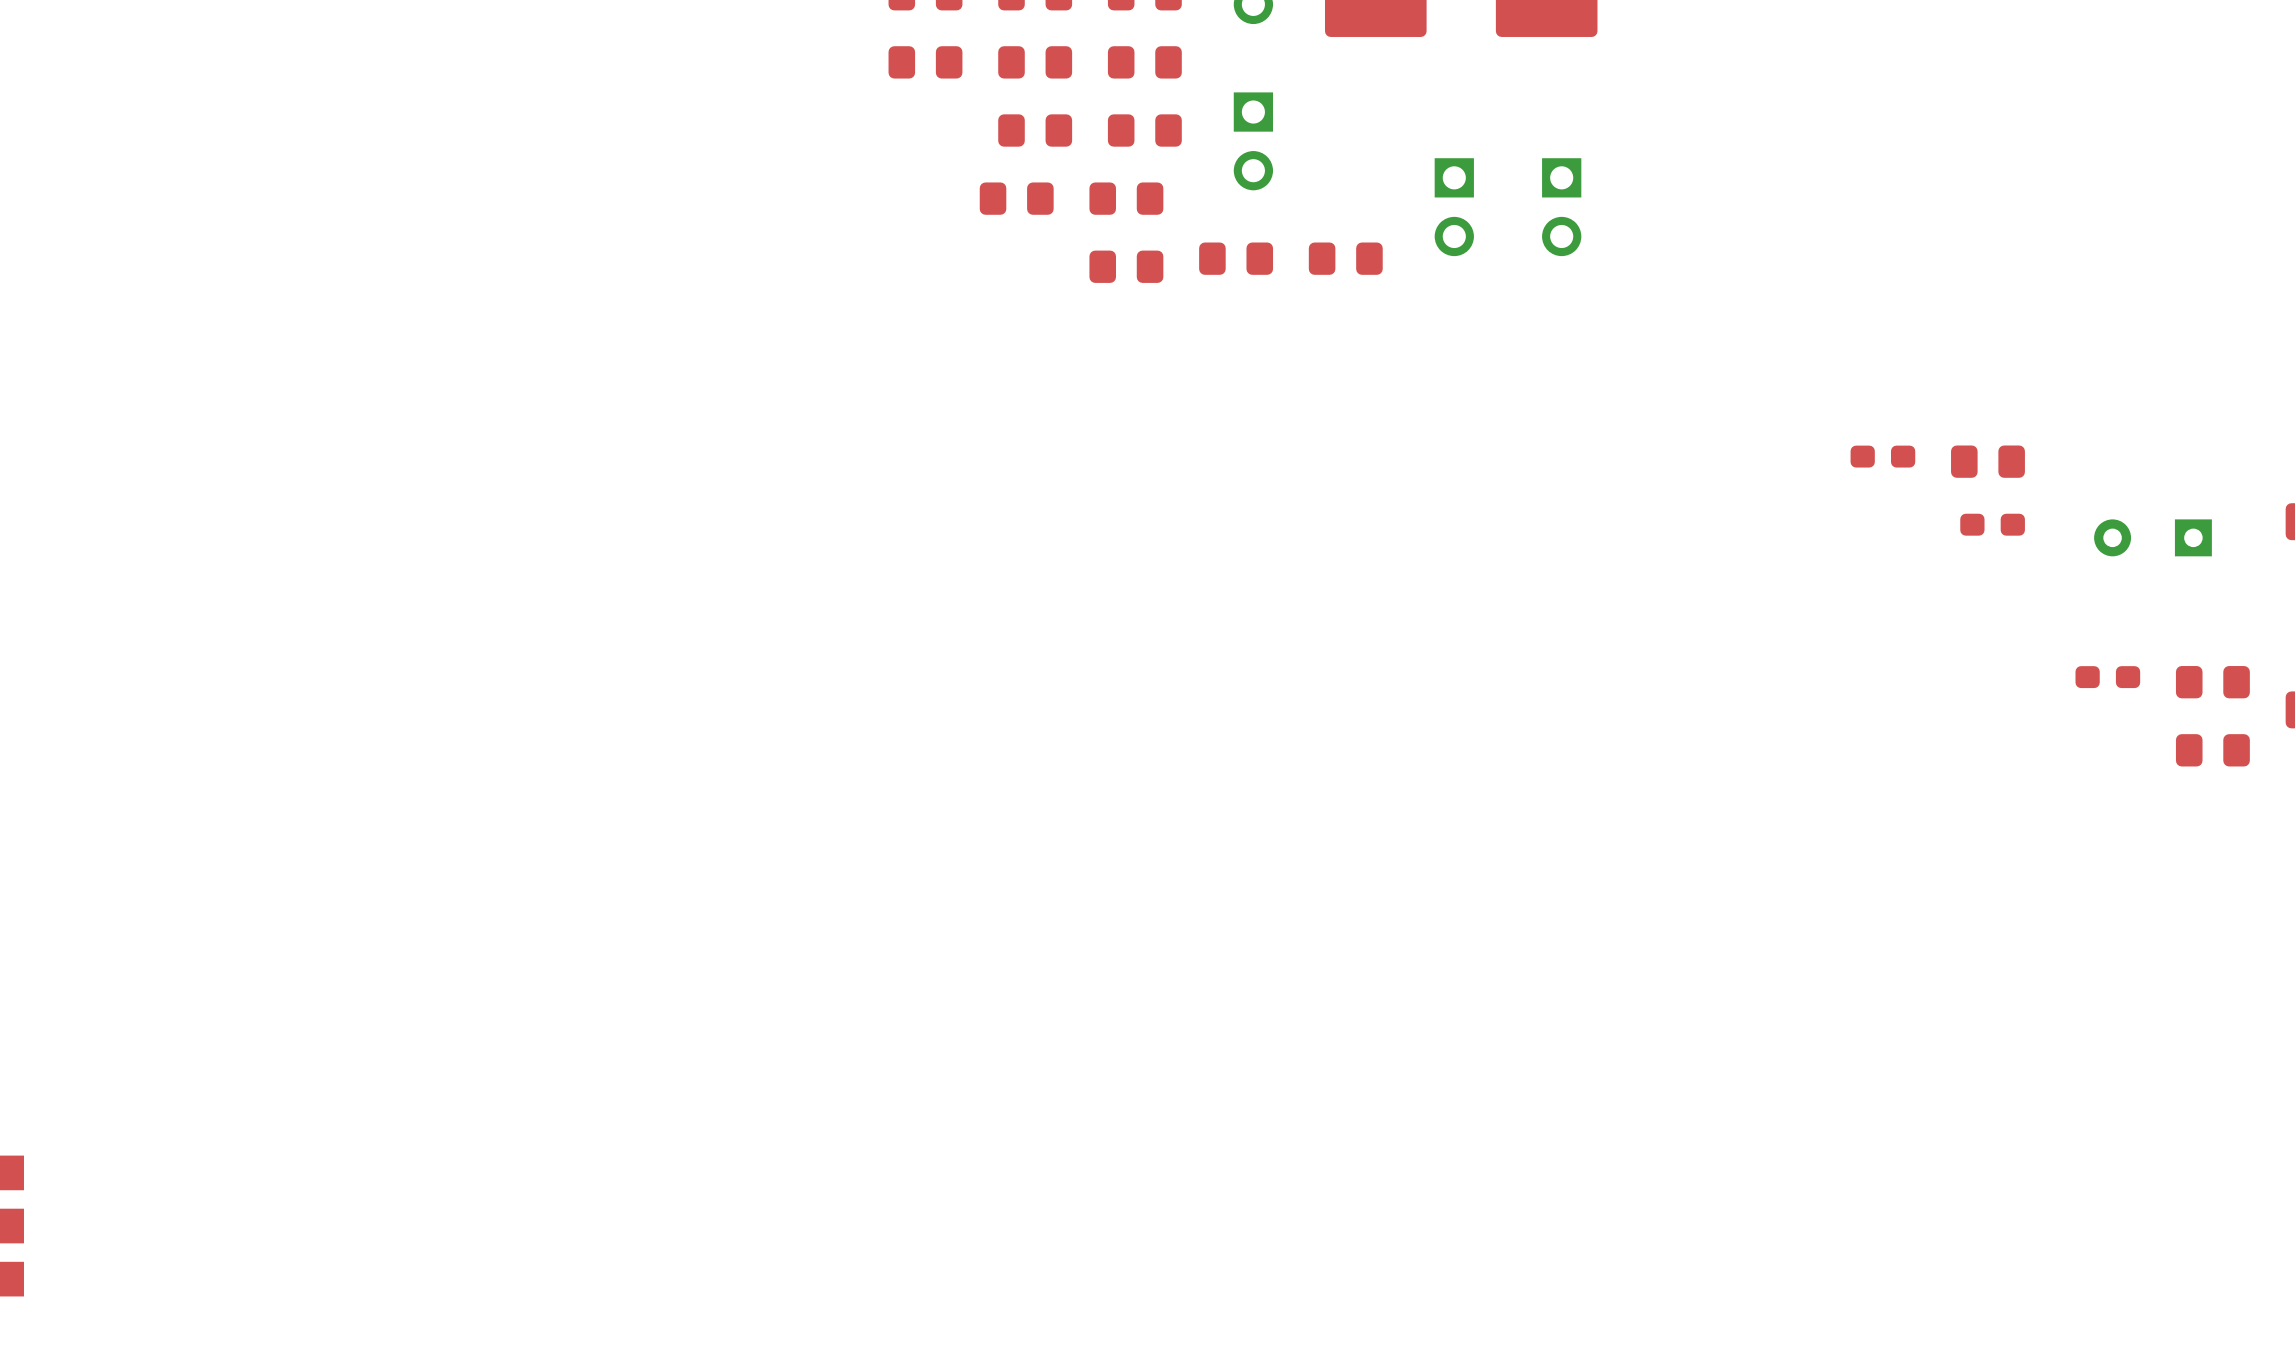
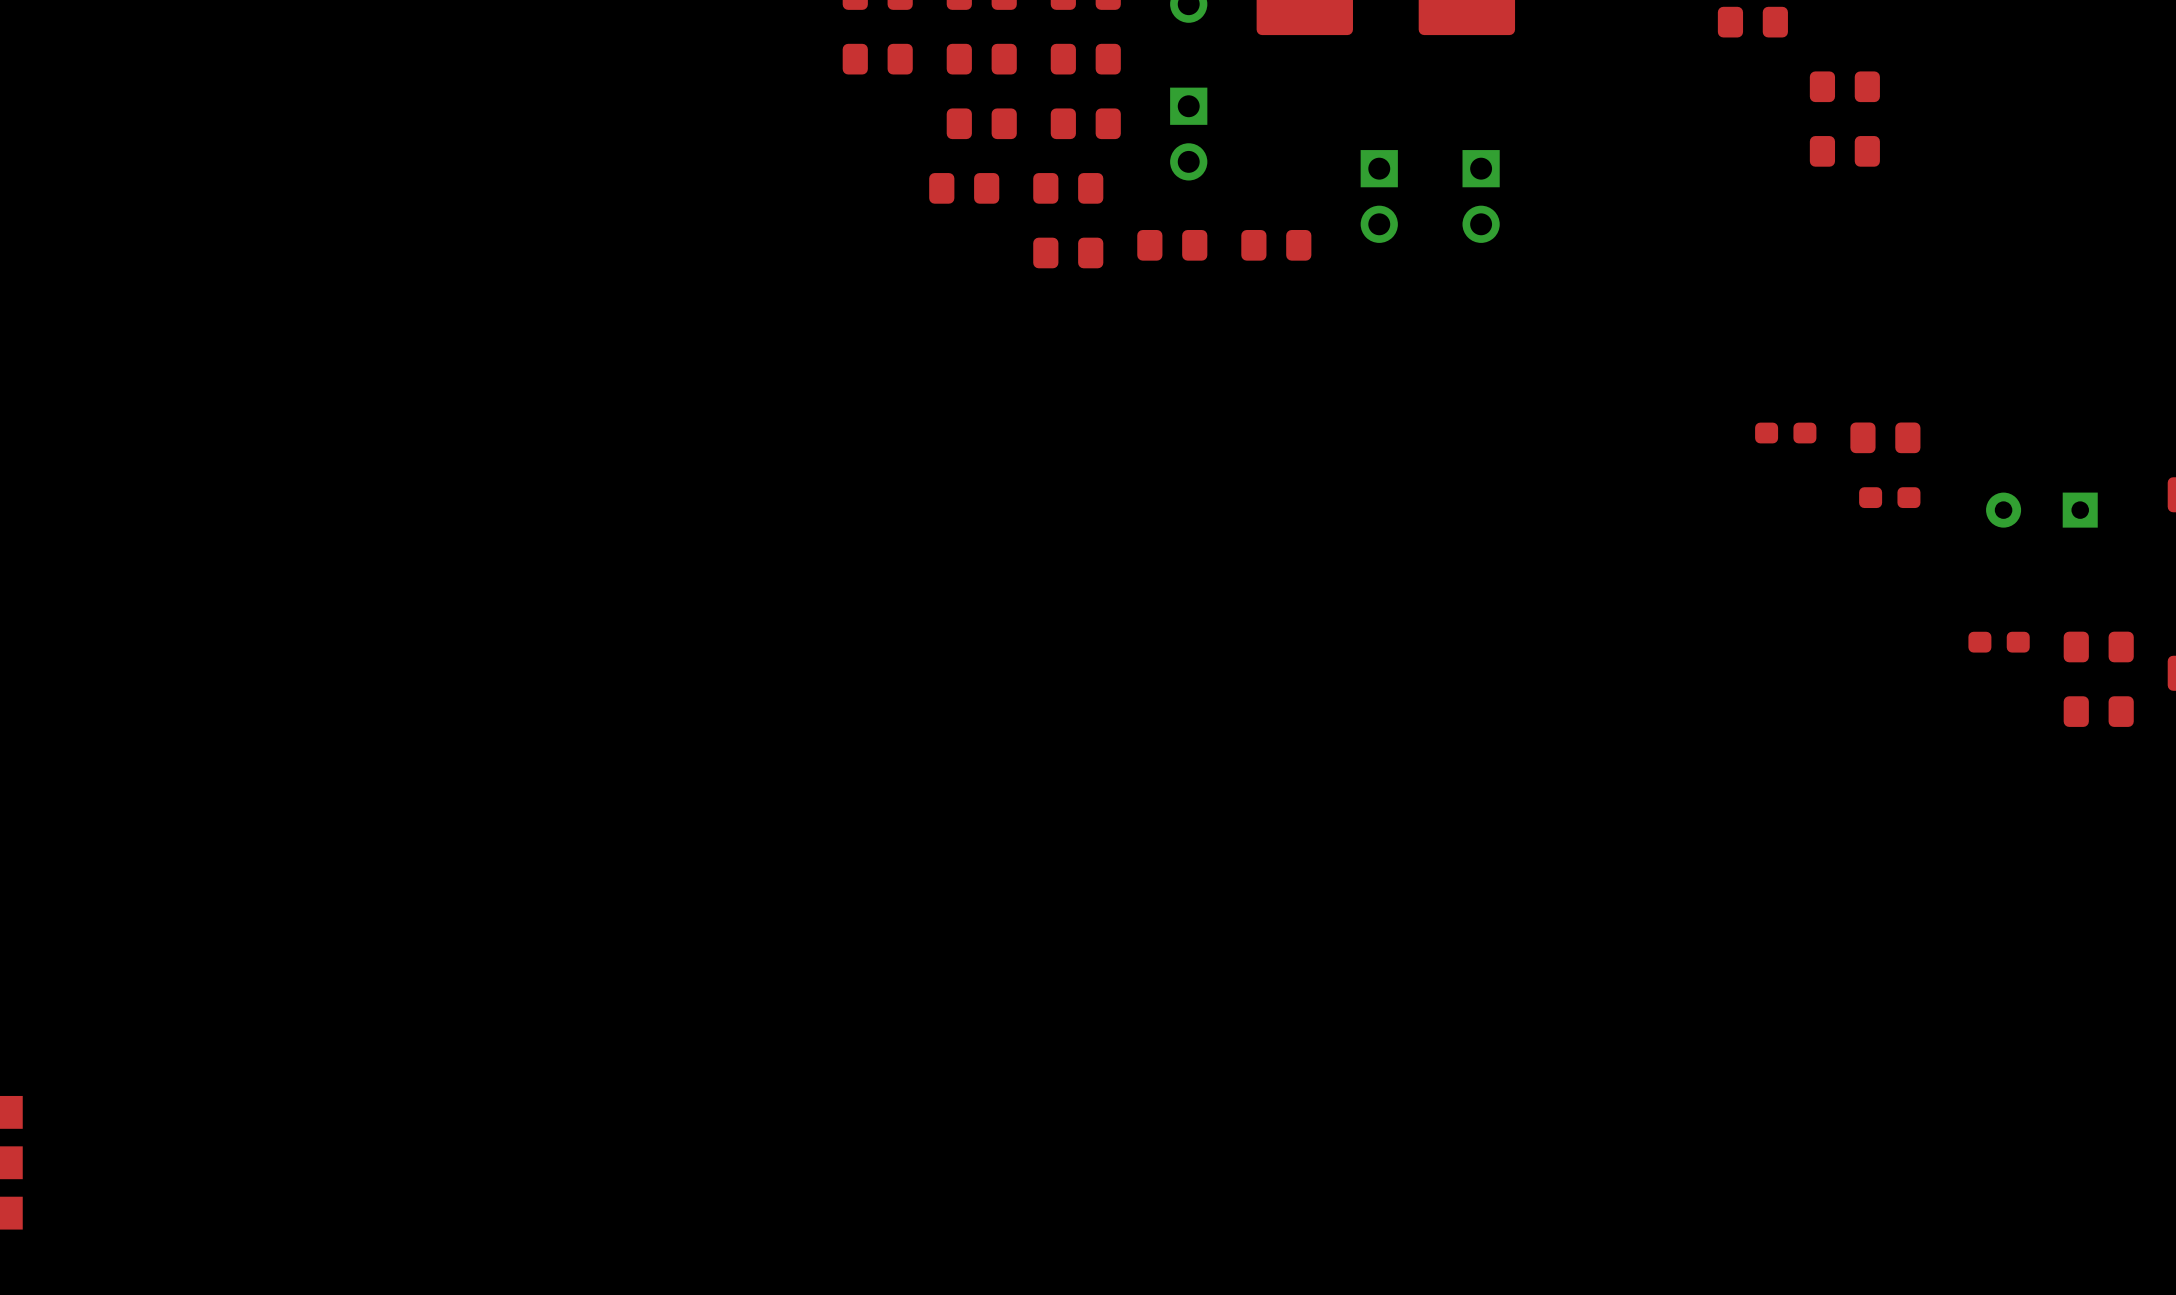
part: none -> (1752, 22)
part: none -> (1844, 86)
part: none -> (1844, 151)

